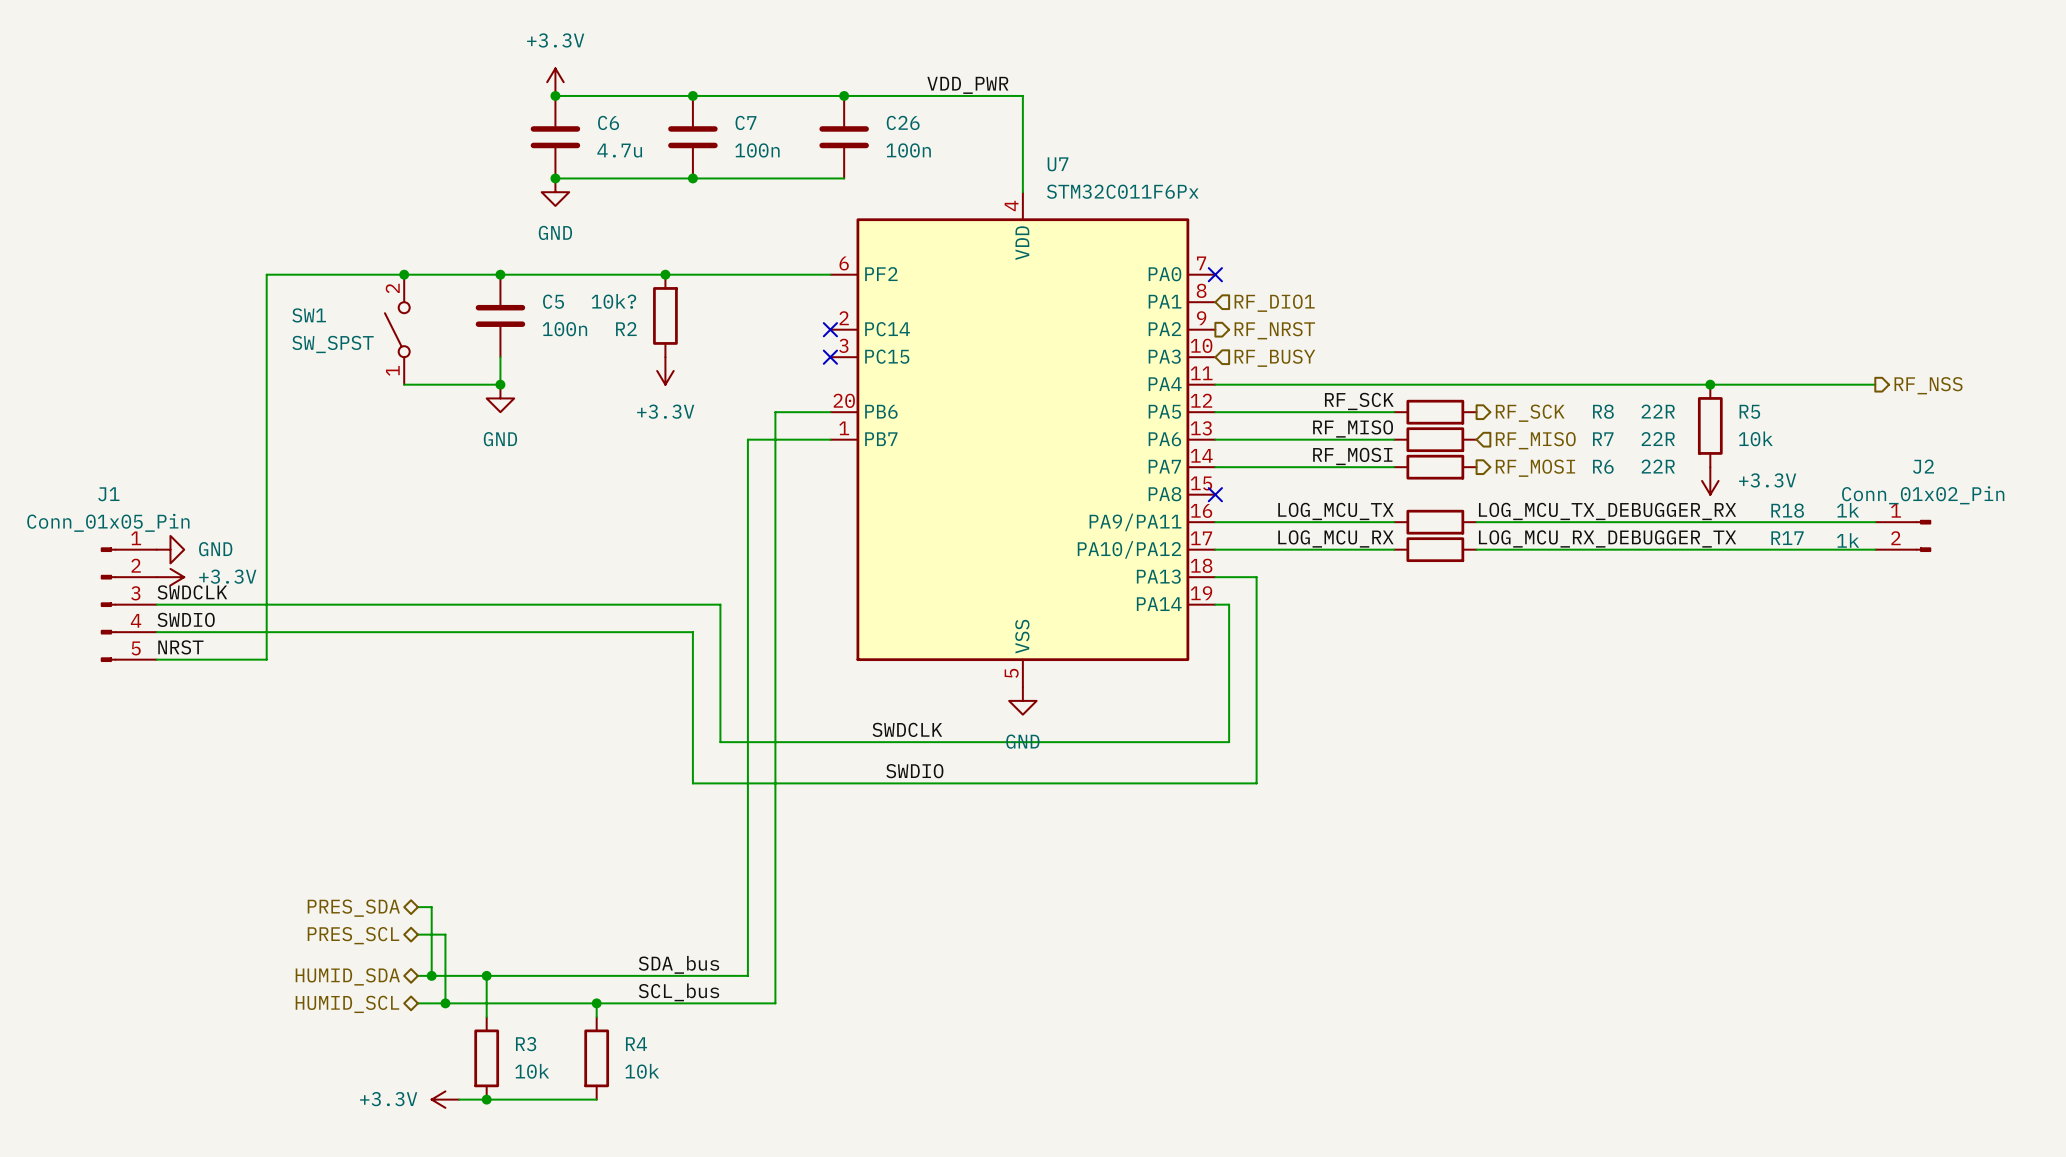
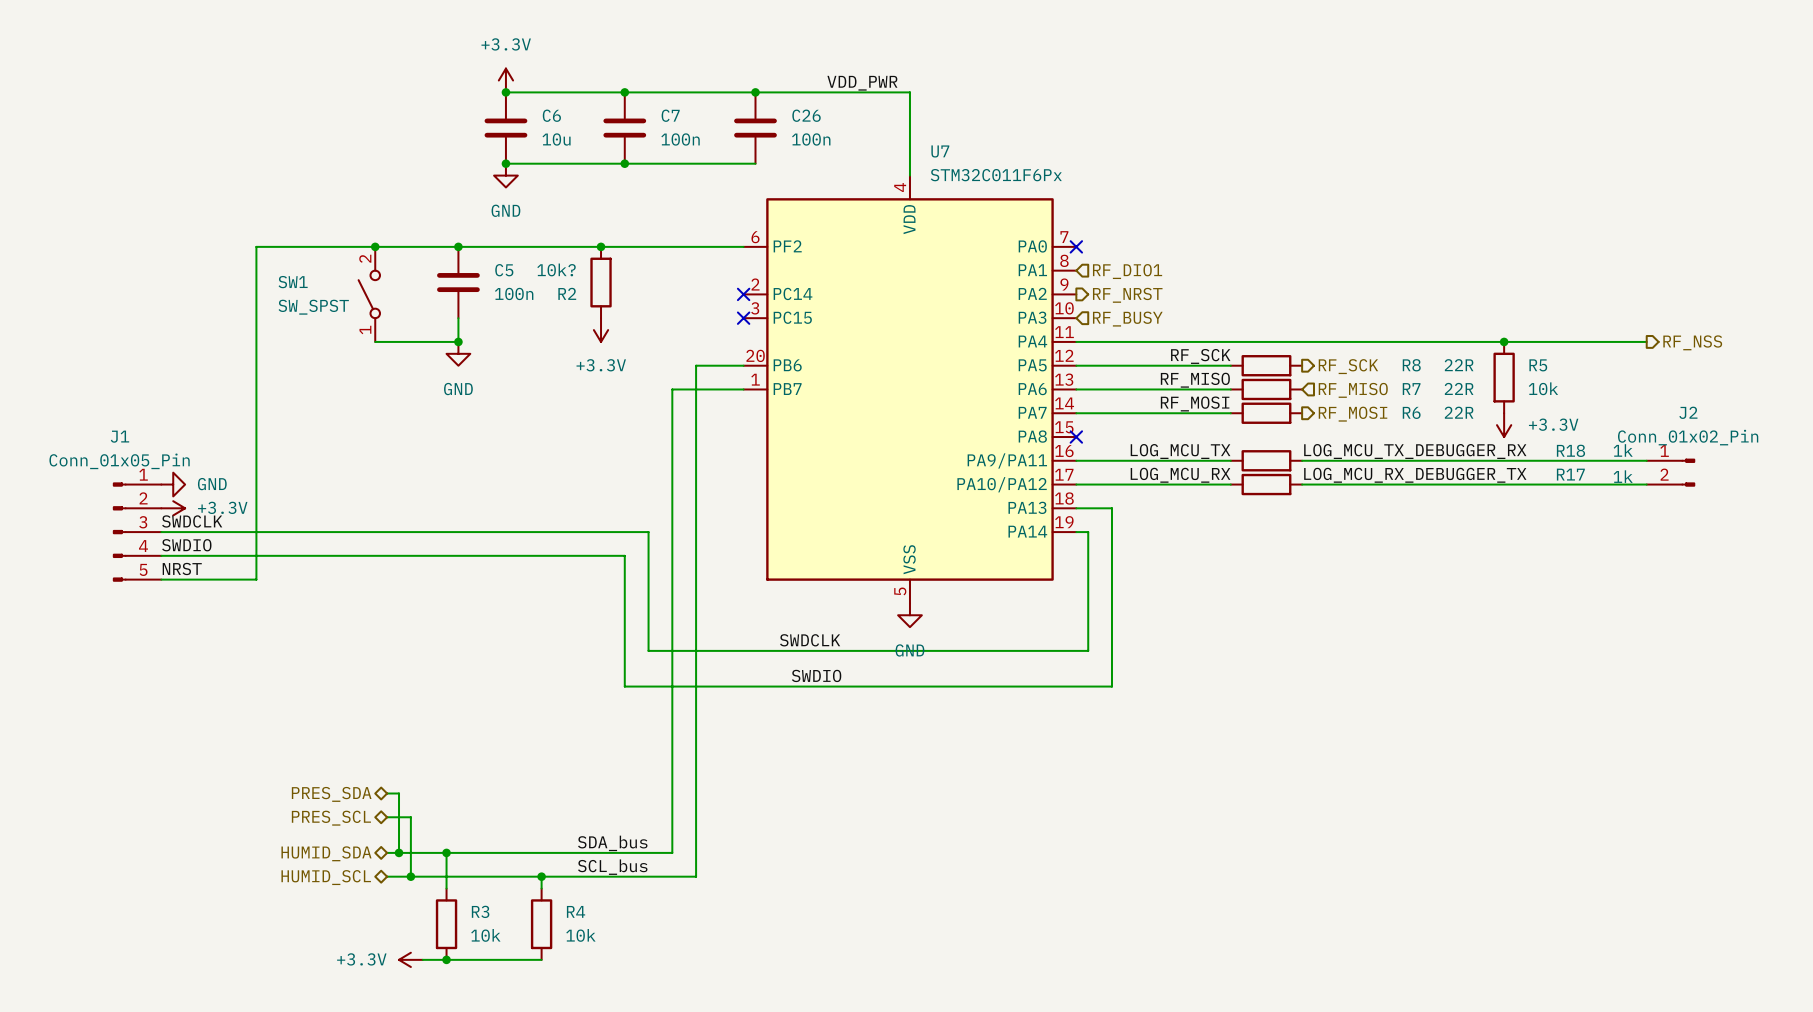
C6 value: 4.7u (619, 150) -> 10u (556, 139)

